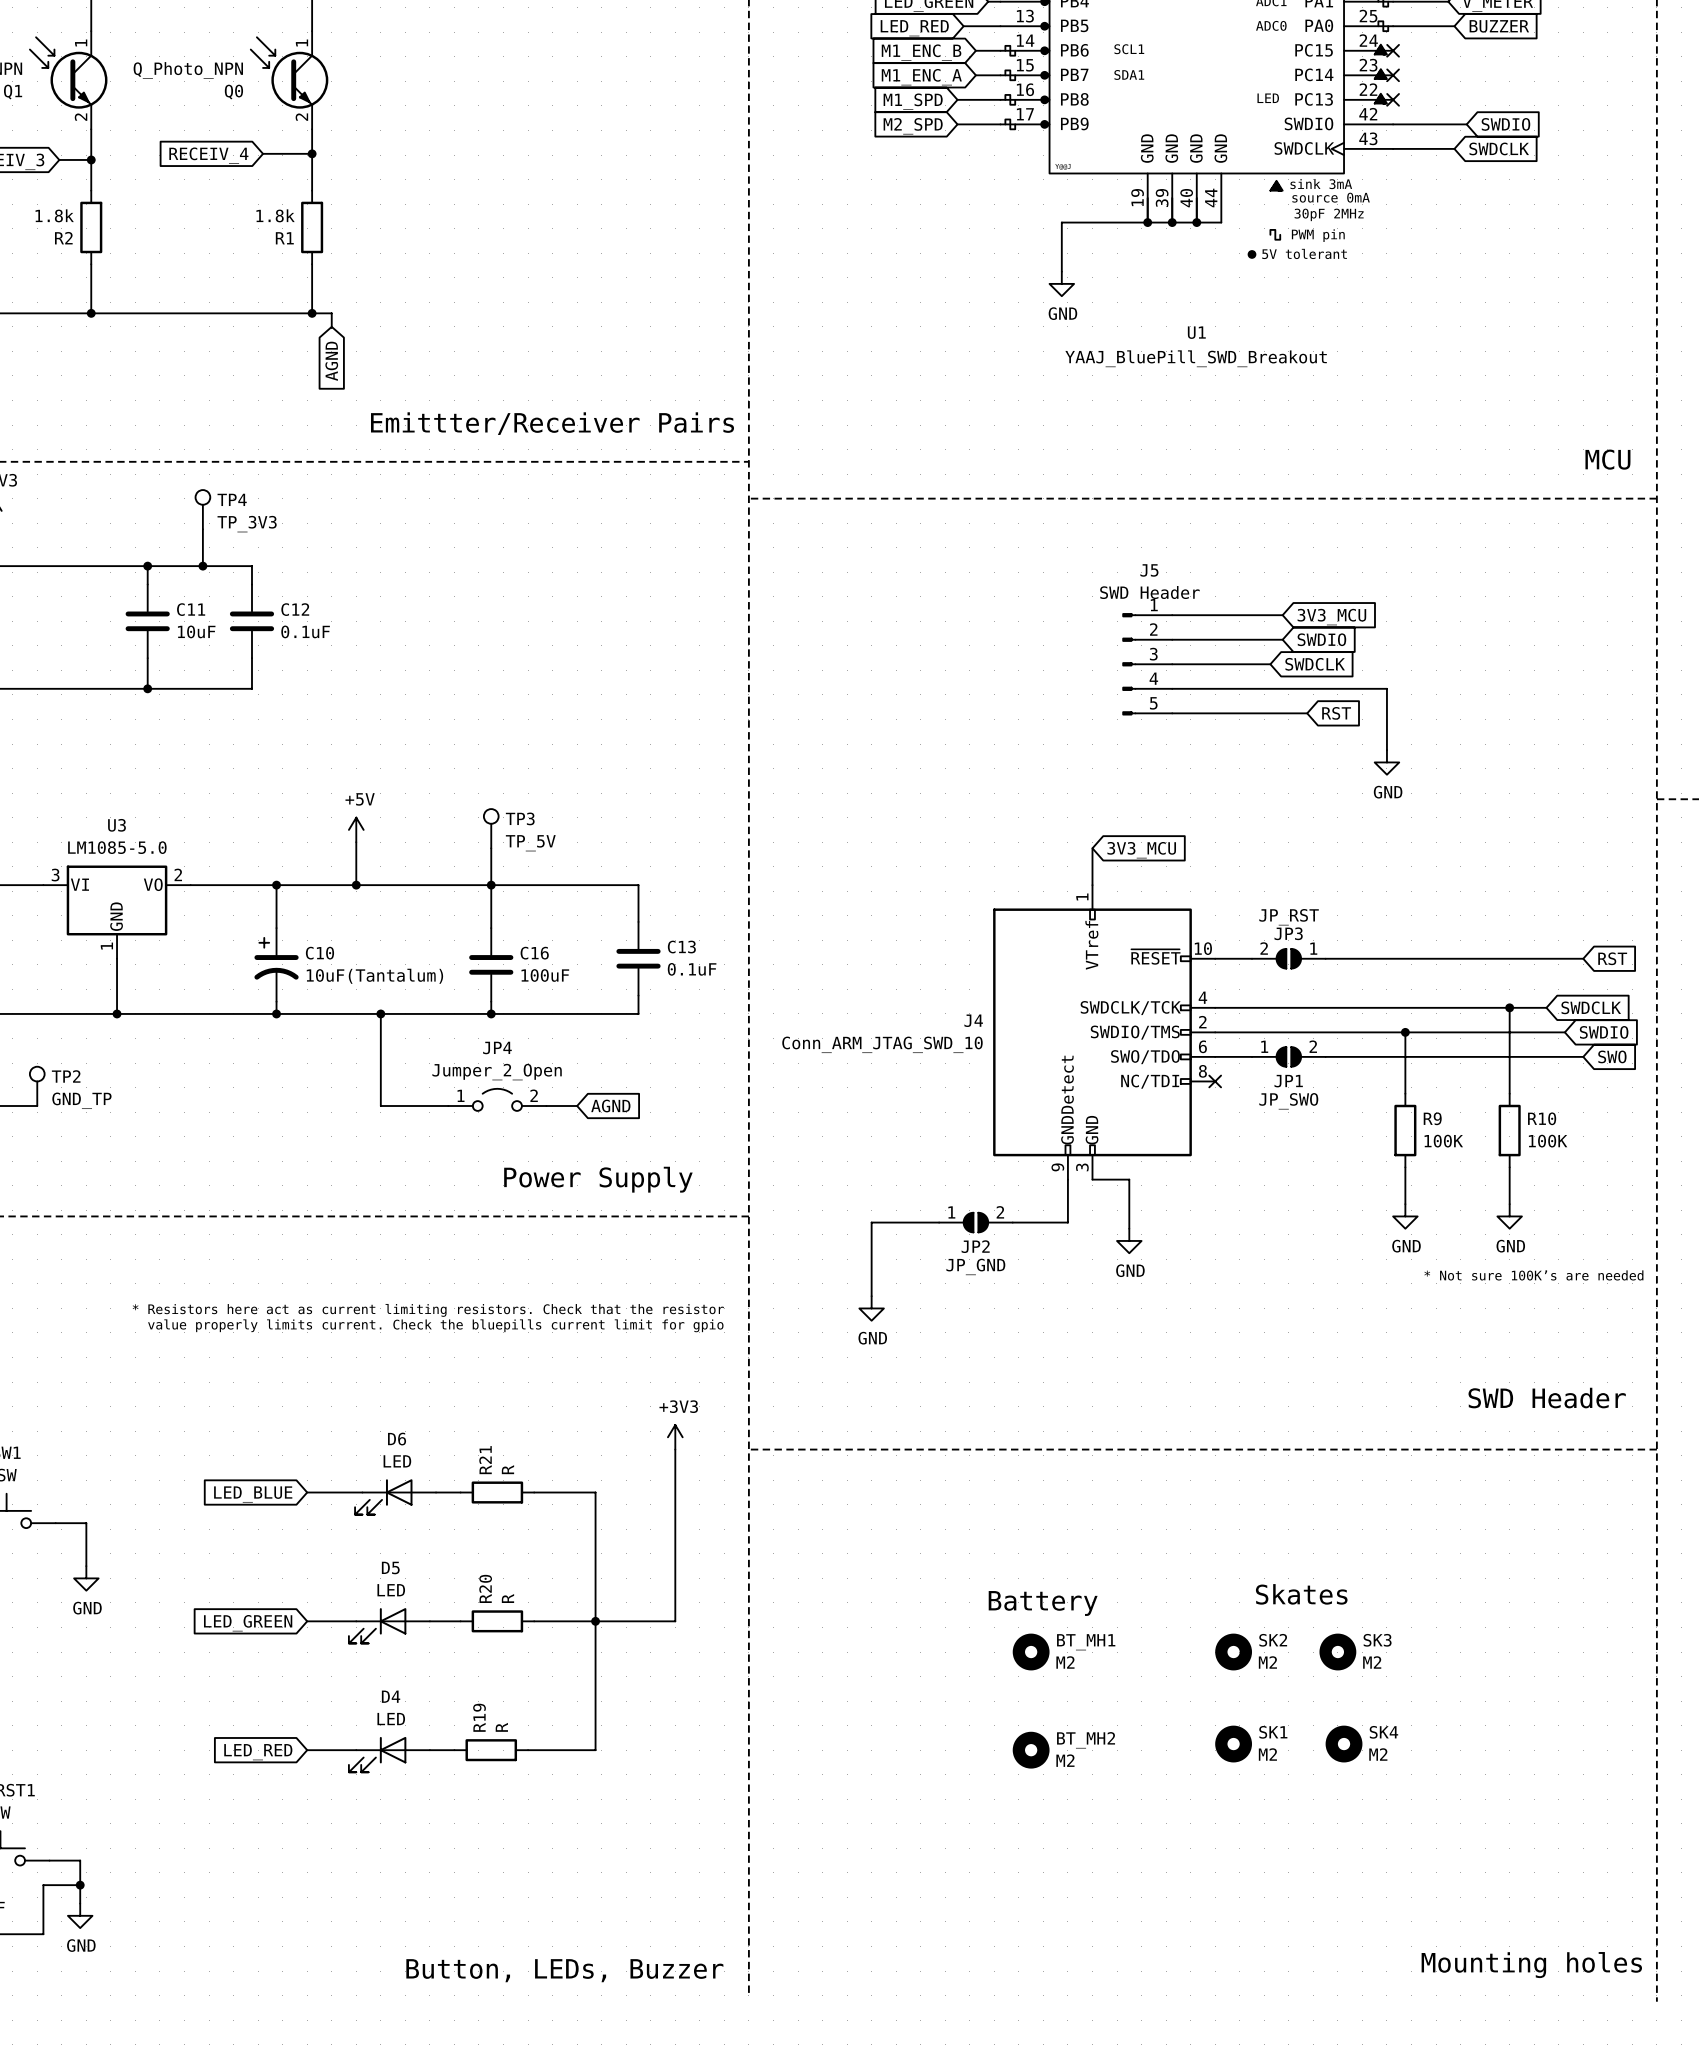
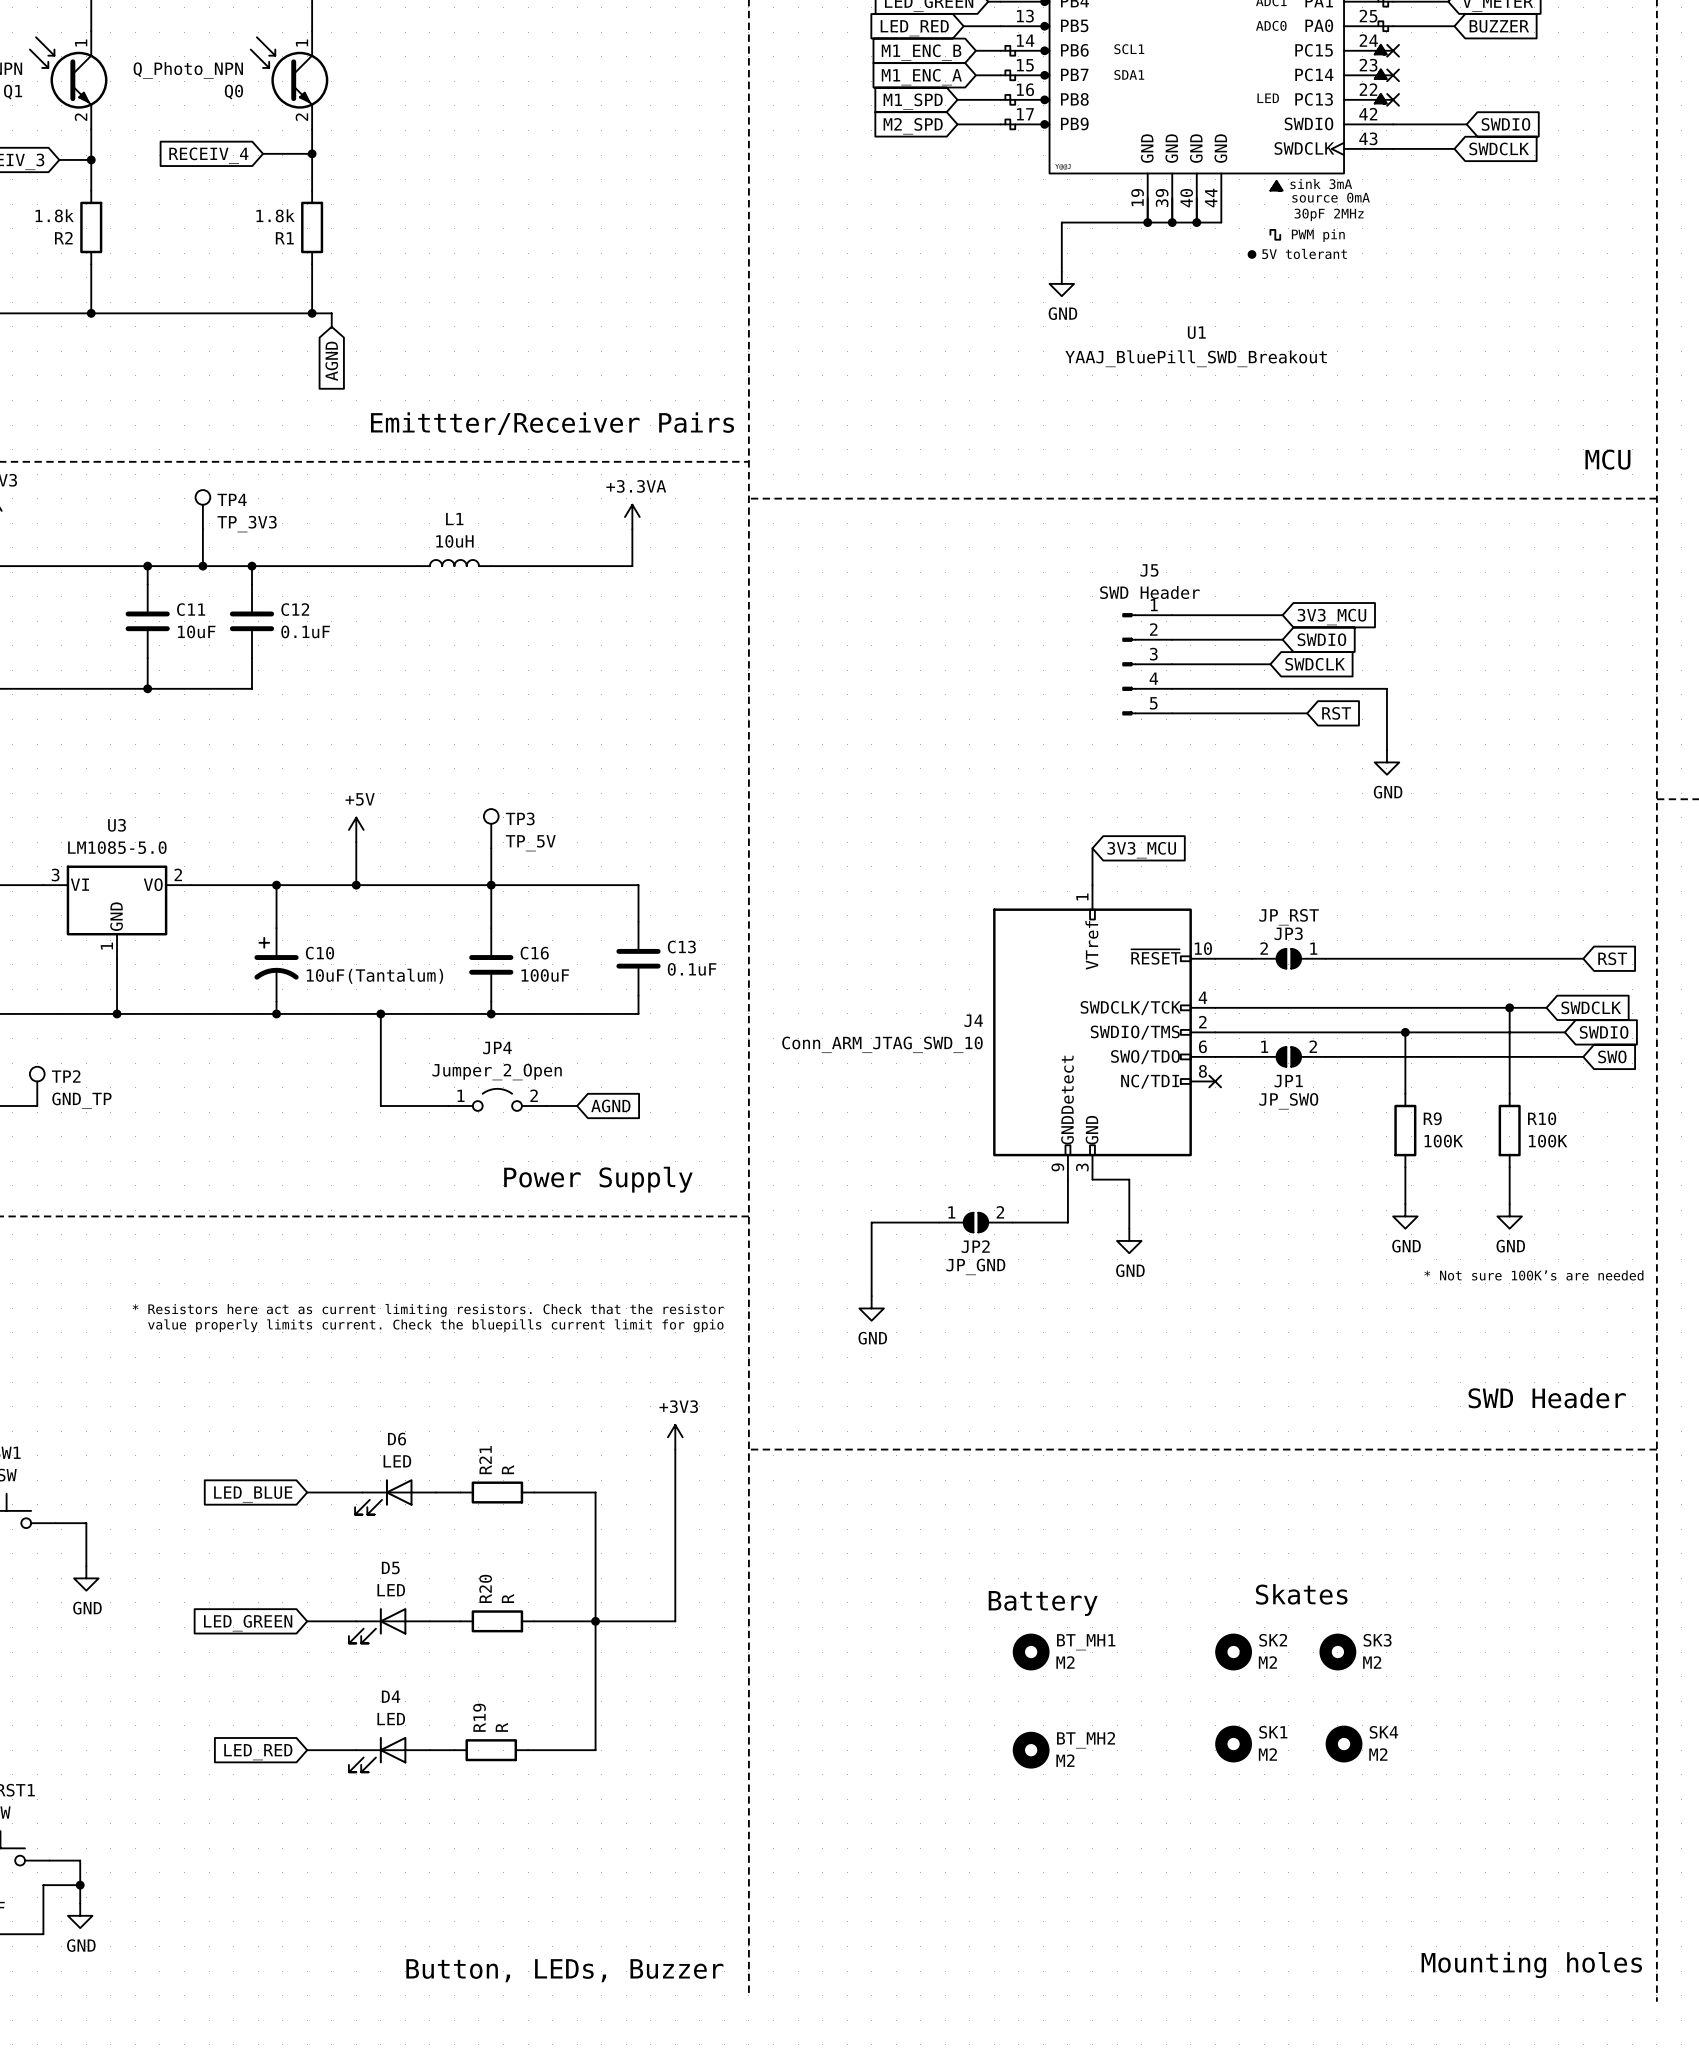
power symbol: none -> +3.3VA (632, 517)
wire: none -> (632, 529) (632, 566) (491, 566)
L1: none -> 10uH (454, 563)
wire: none -> (251, 566) (417, 566)
junction: none -> (251, 566)

